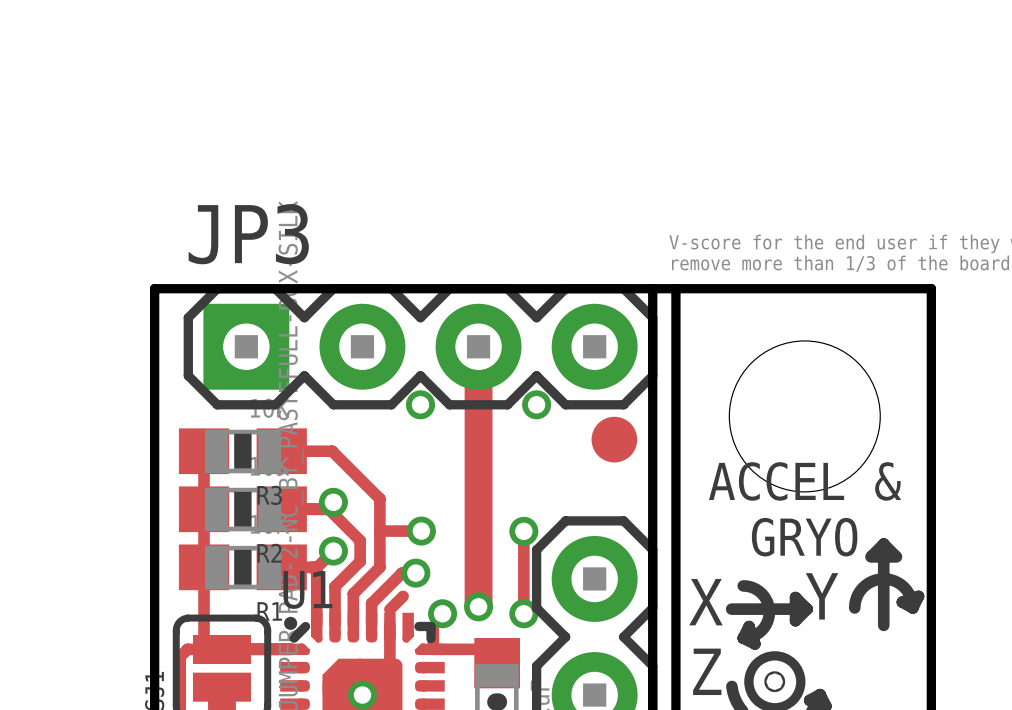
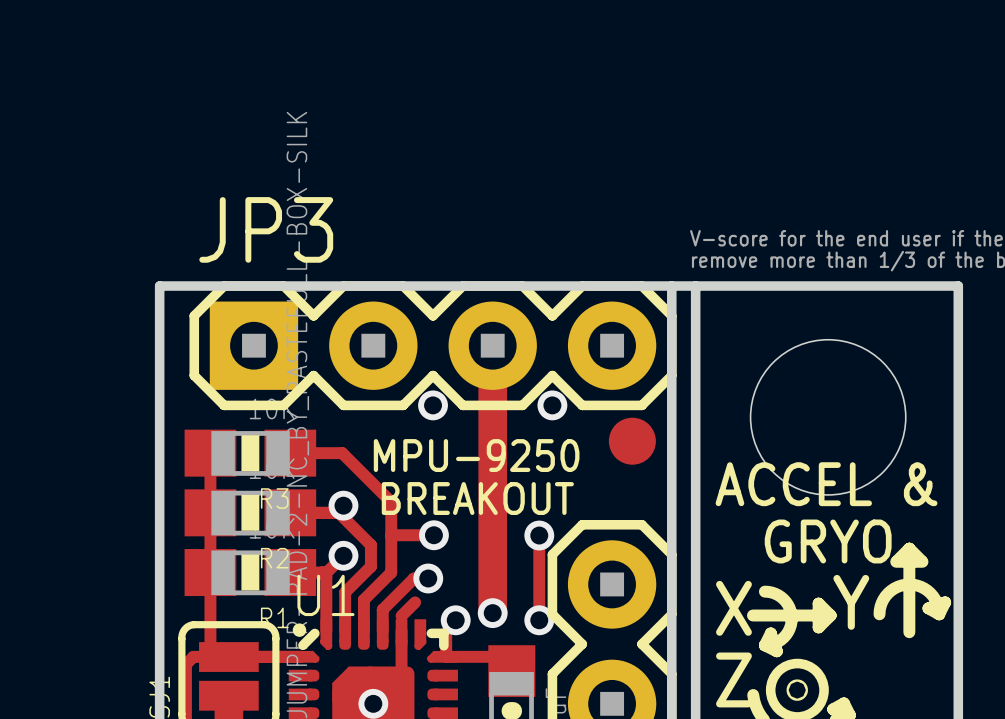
text: none -> MPU-9250 (476, 455)
text: none -> BREAKOUT (477, 498)

